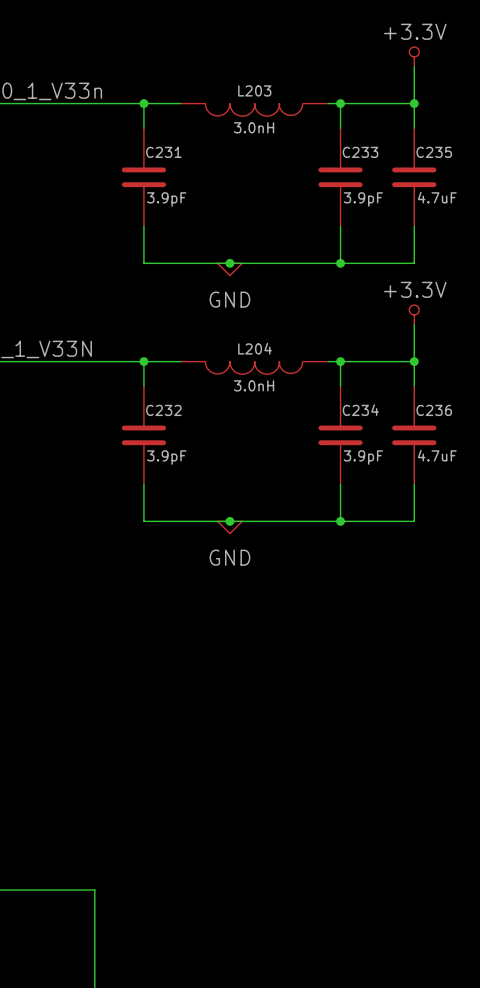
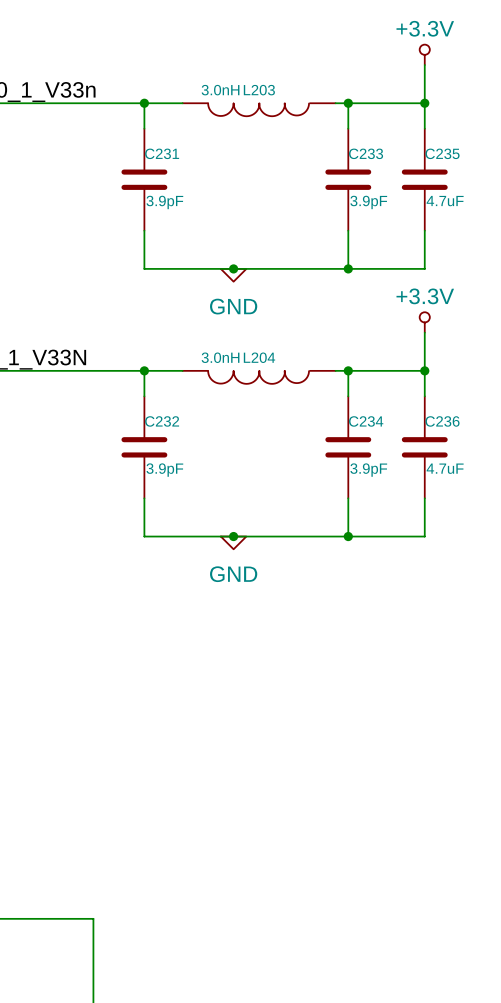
L203 value position: 3.0nH (254, 127) -> 3.0nH (220, 90)
L204 value position: 3.0nH (254, 385) -> 3.0nH (220, 357)

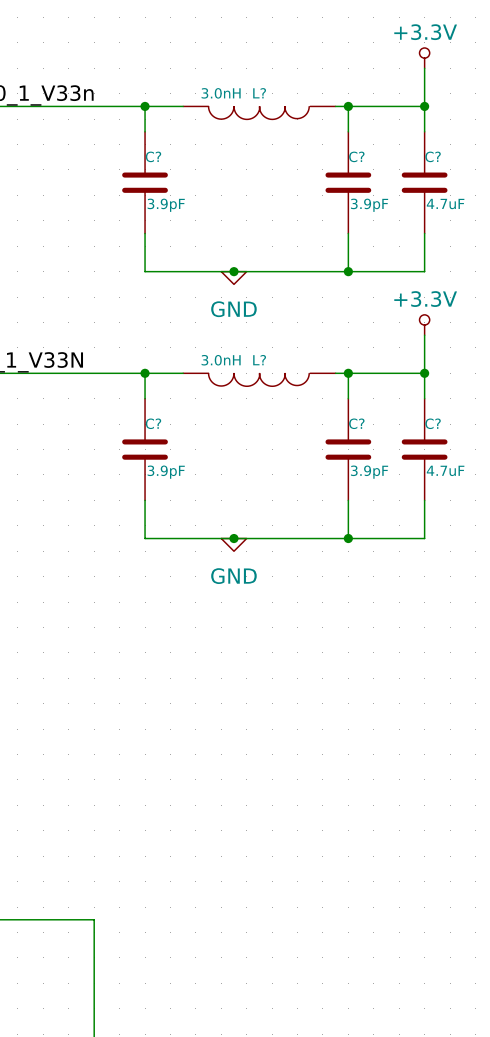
L203 name: L203 (259, 90) -> L? (259, 93)
C231 name: C231 (162, 153) -> C? (153, 156)
C233 name: C233 (366, 153) -> C? (356, 156)
C235 name: C235 (442, 153) -> C? (433, 156)
L204 name: L204 (259, 357) -> L? (259, 360)
C232 name: C232 (162, 421) -> C? (153, 423)
C234 name: C234 (366, 421) -> C? (356, 423)
C236 name: C236 (442, 421) -> C? (433, 423)

